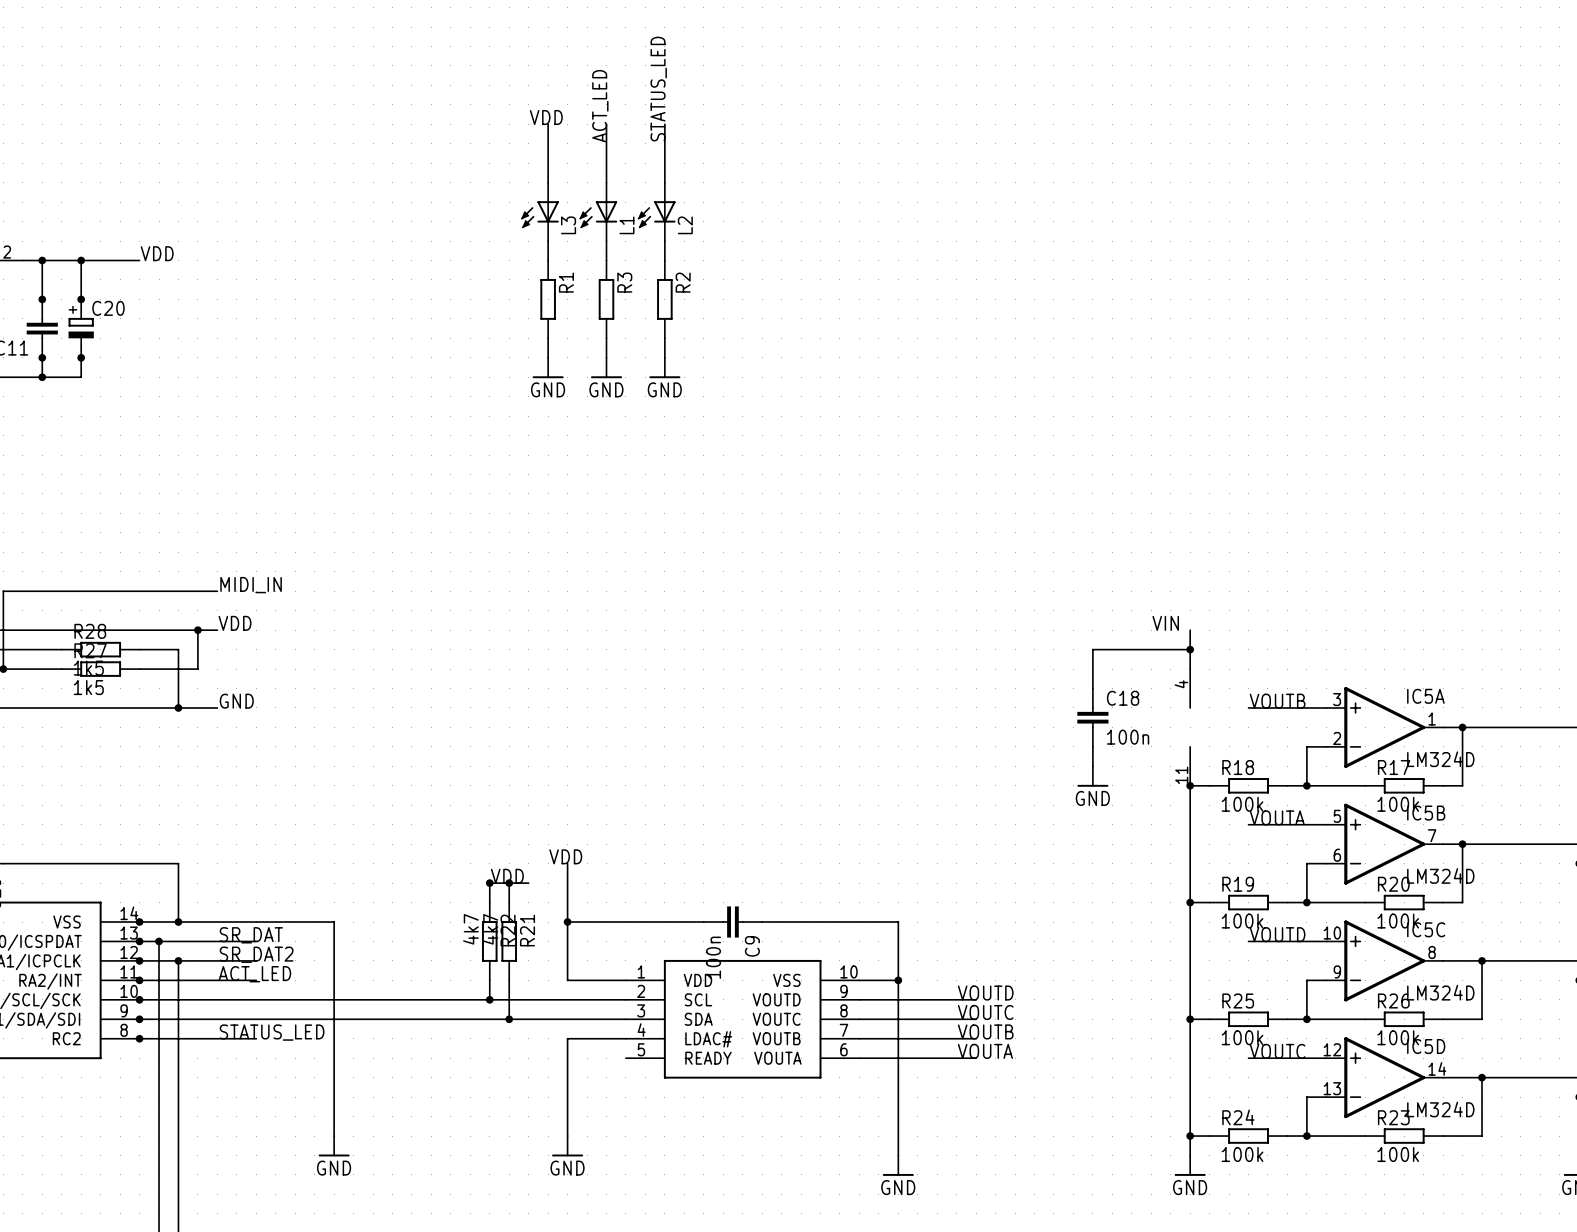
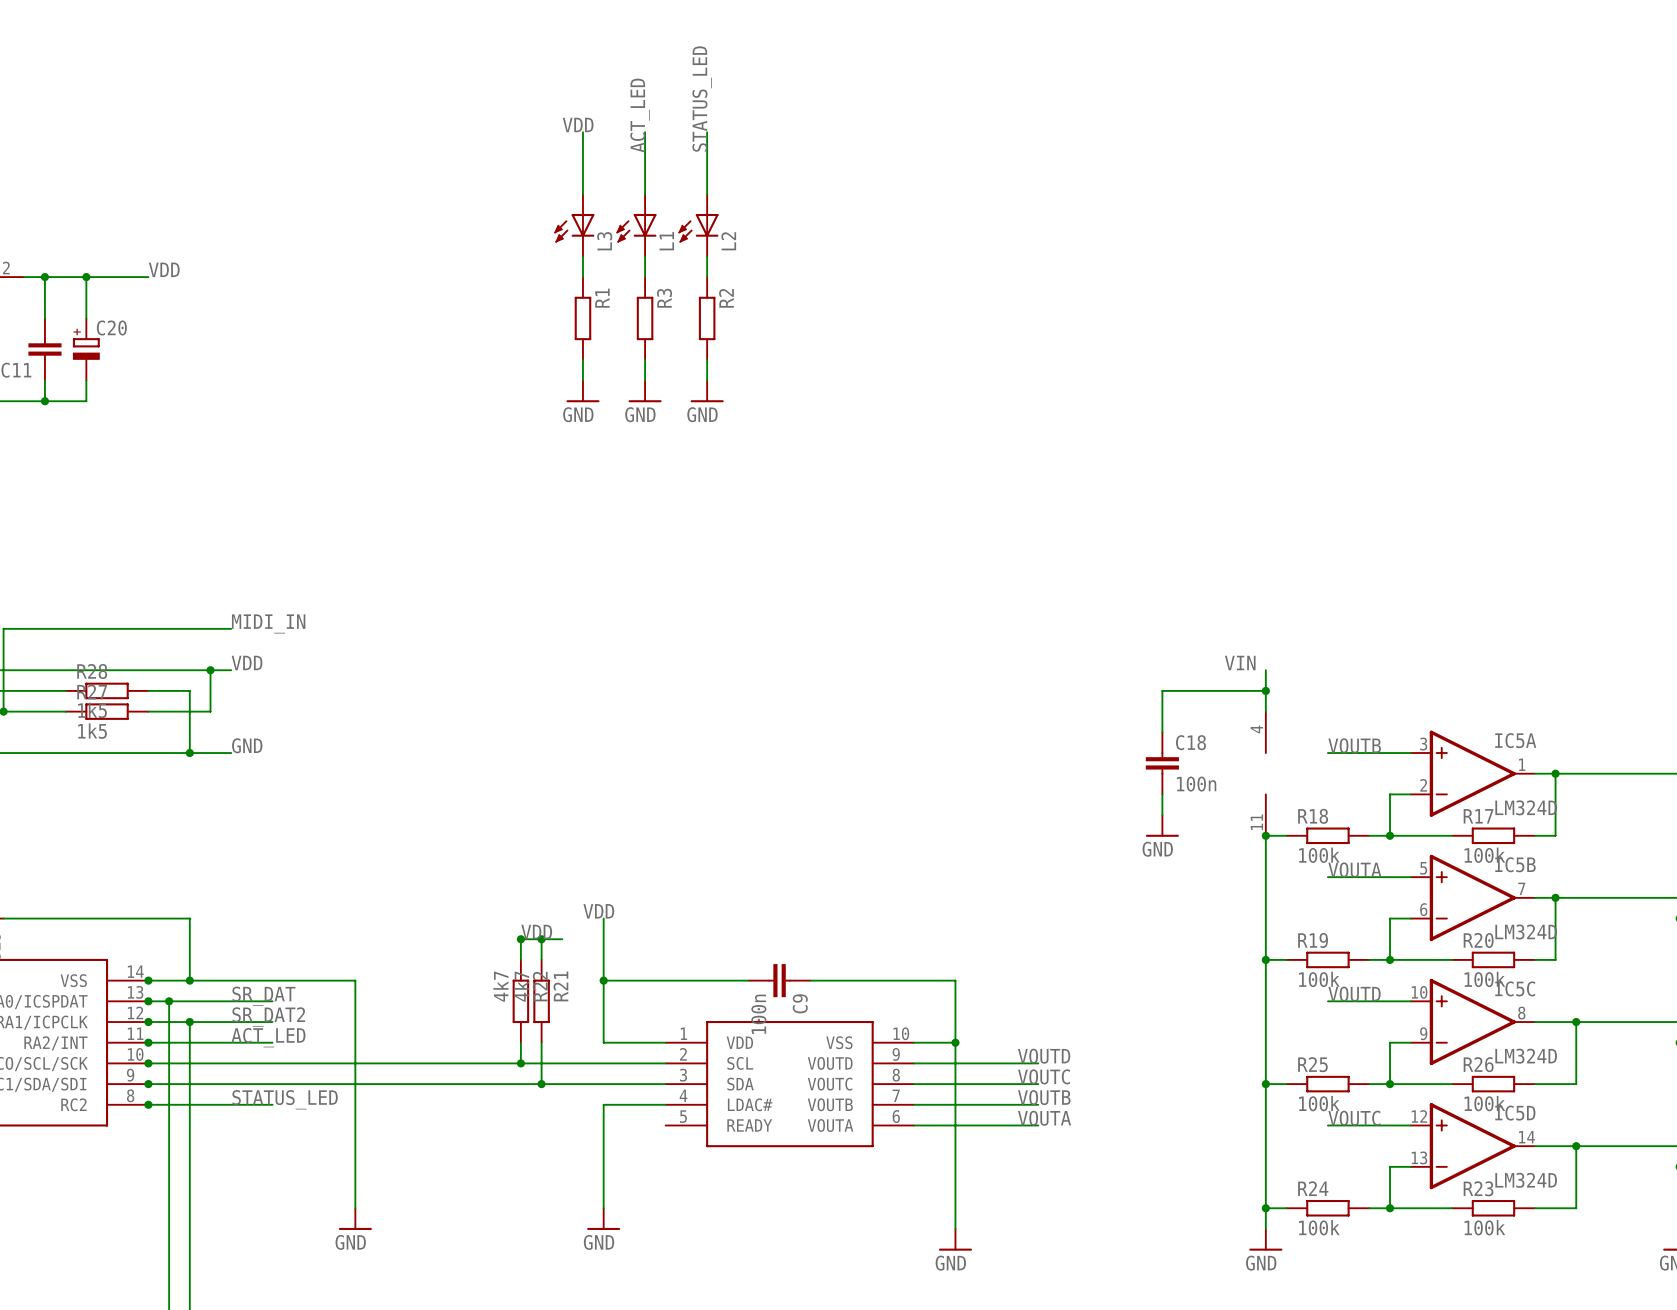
junction: (42, 299) -> none
junction: (81, 299) -> none
junction: (42, 357) -> none
junction: (81, 357) -> none

